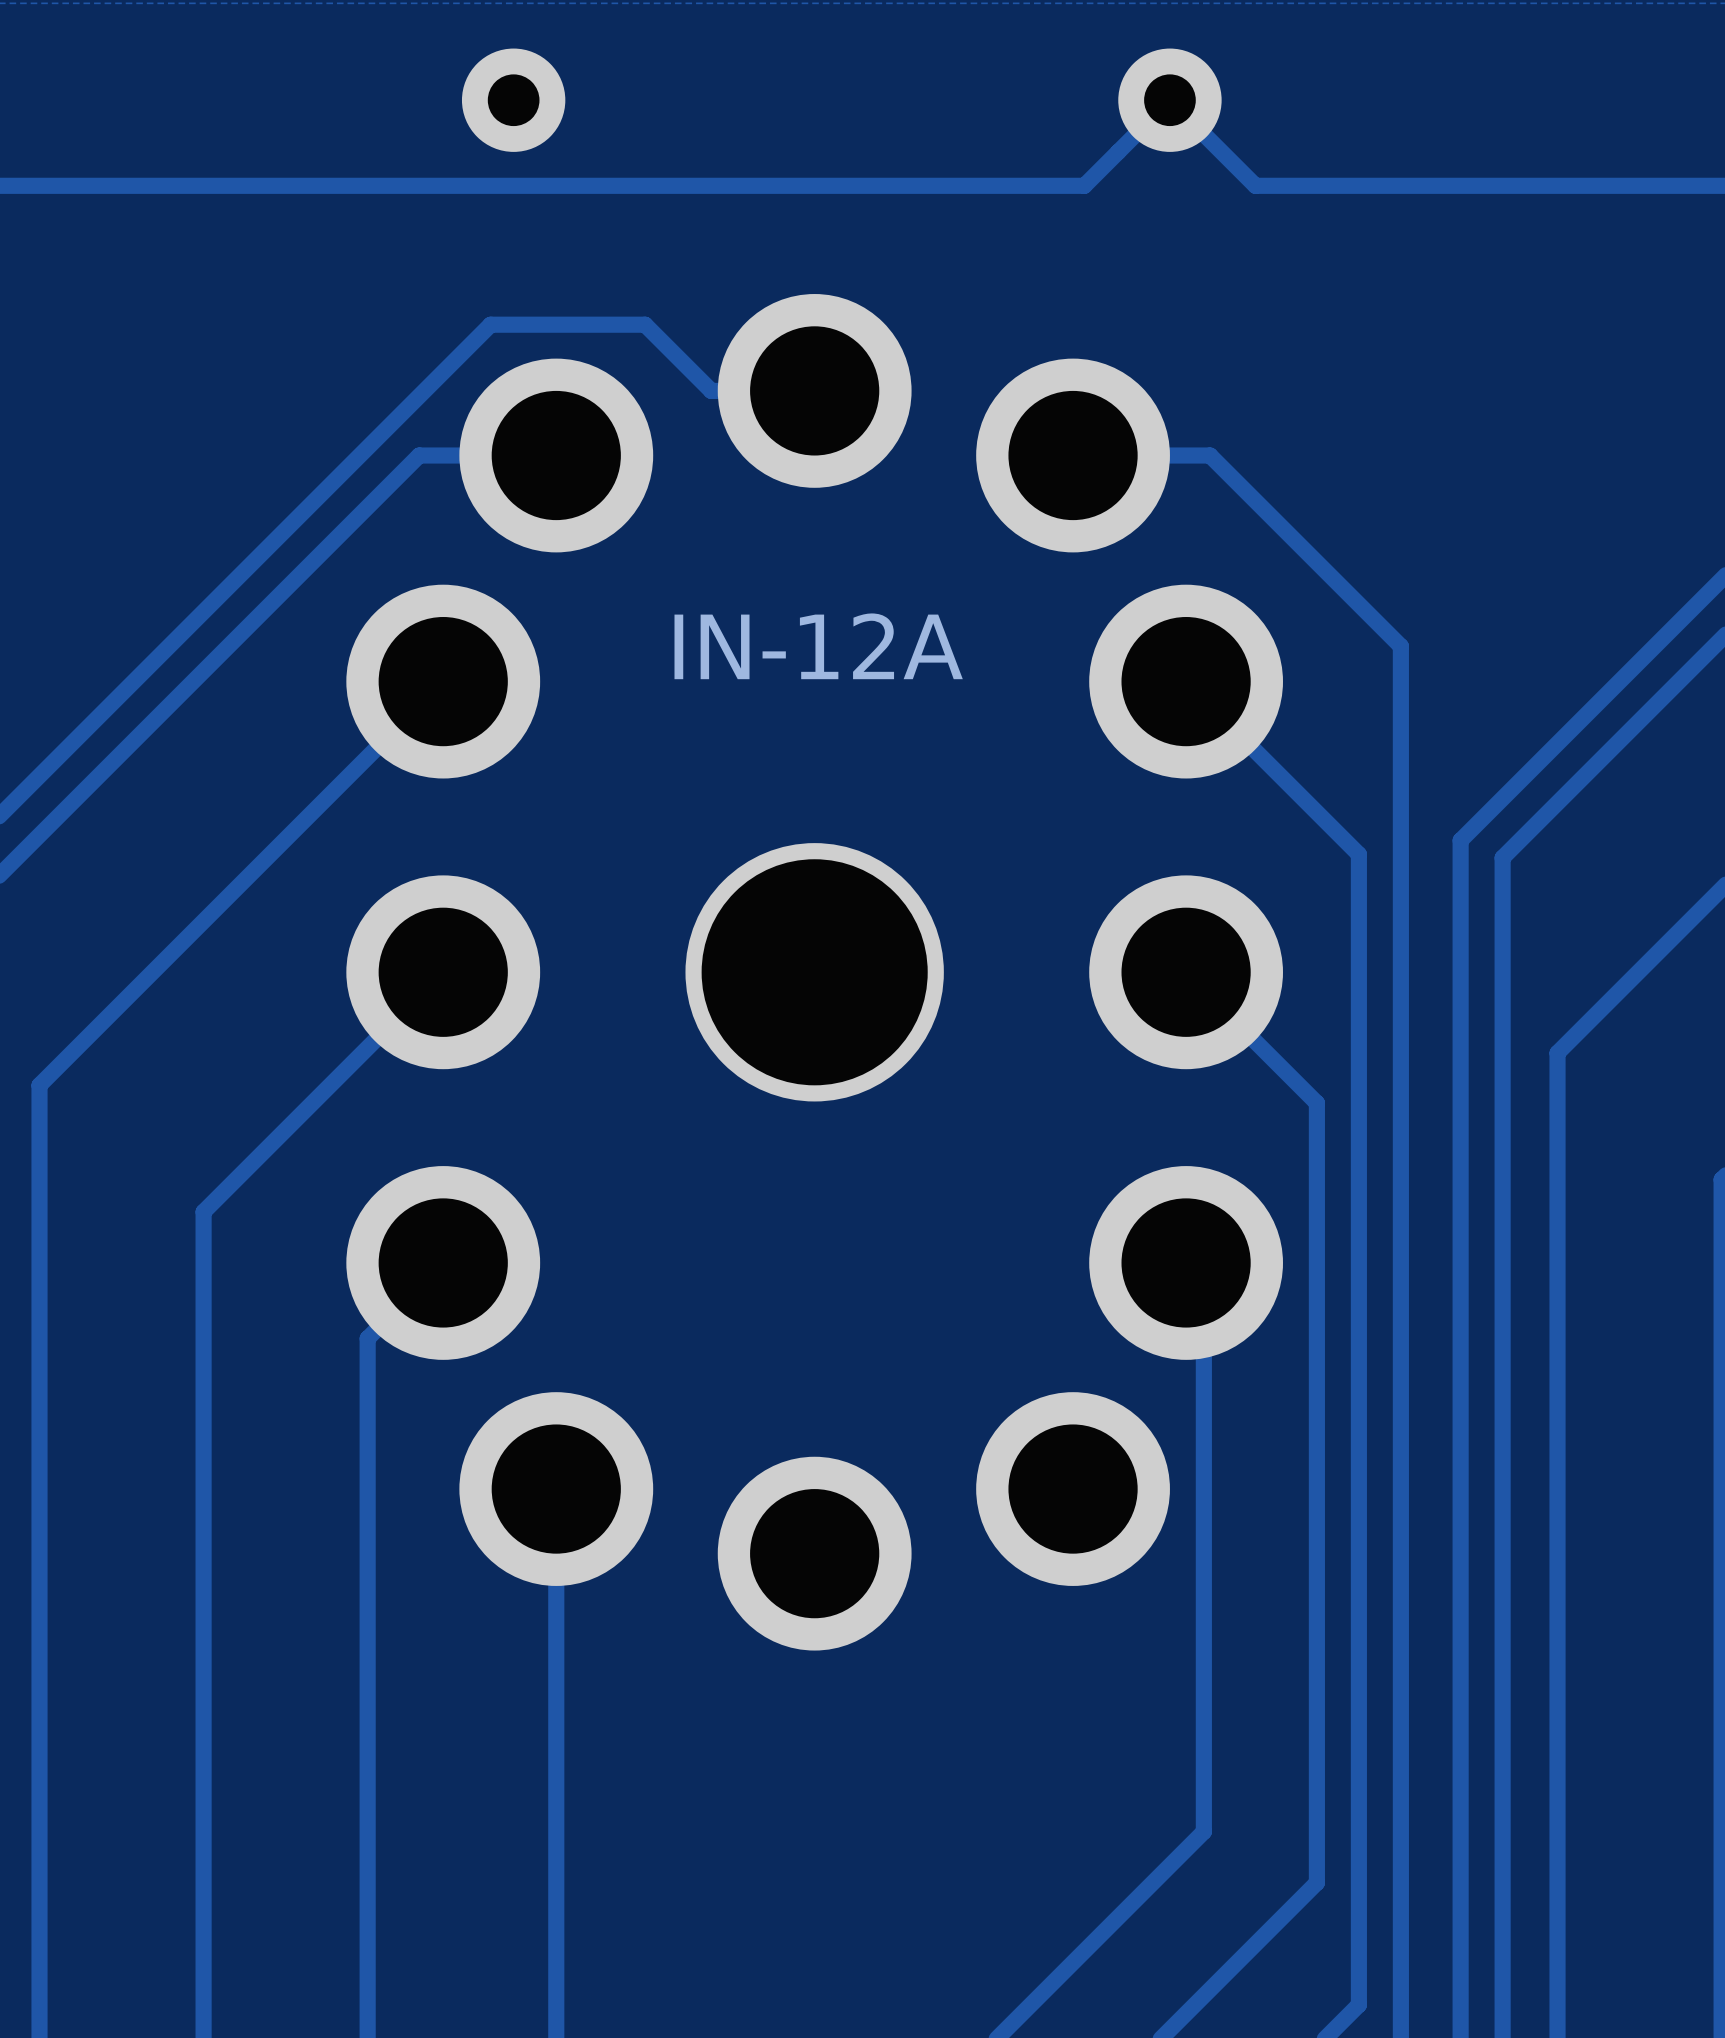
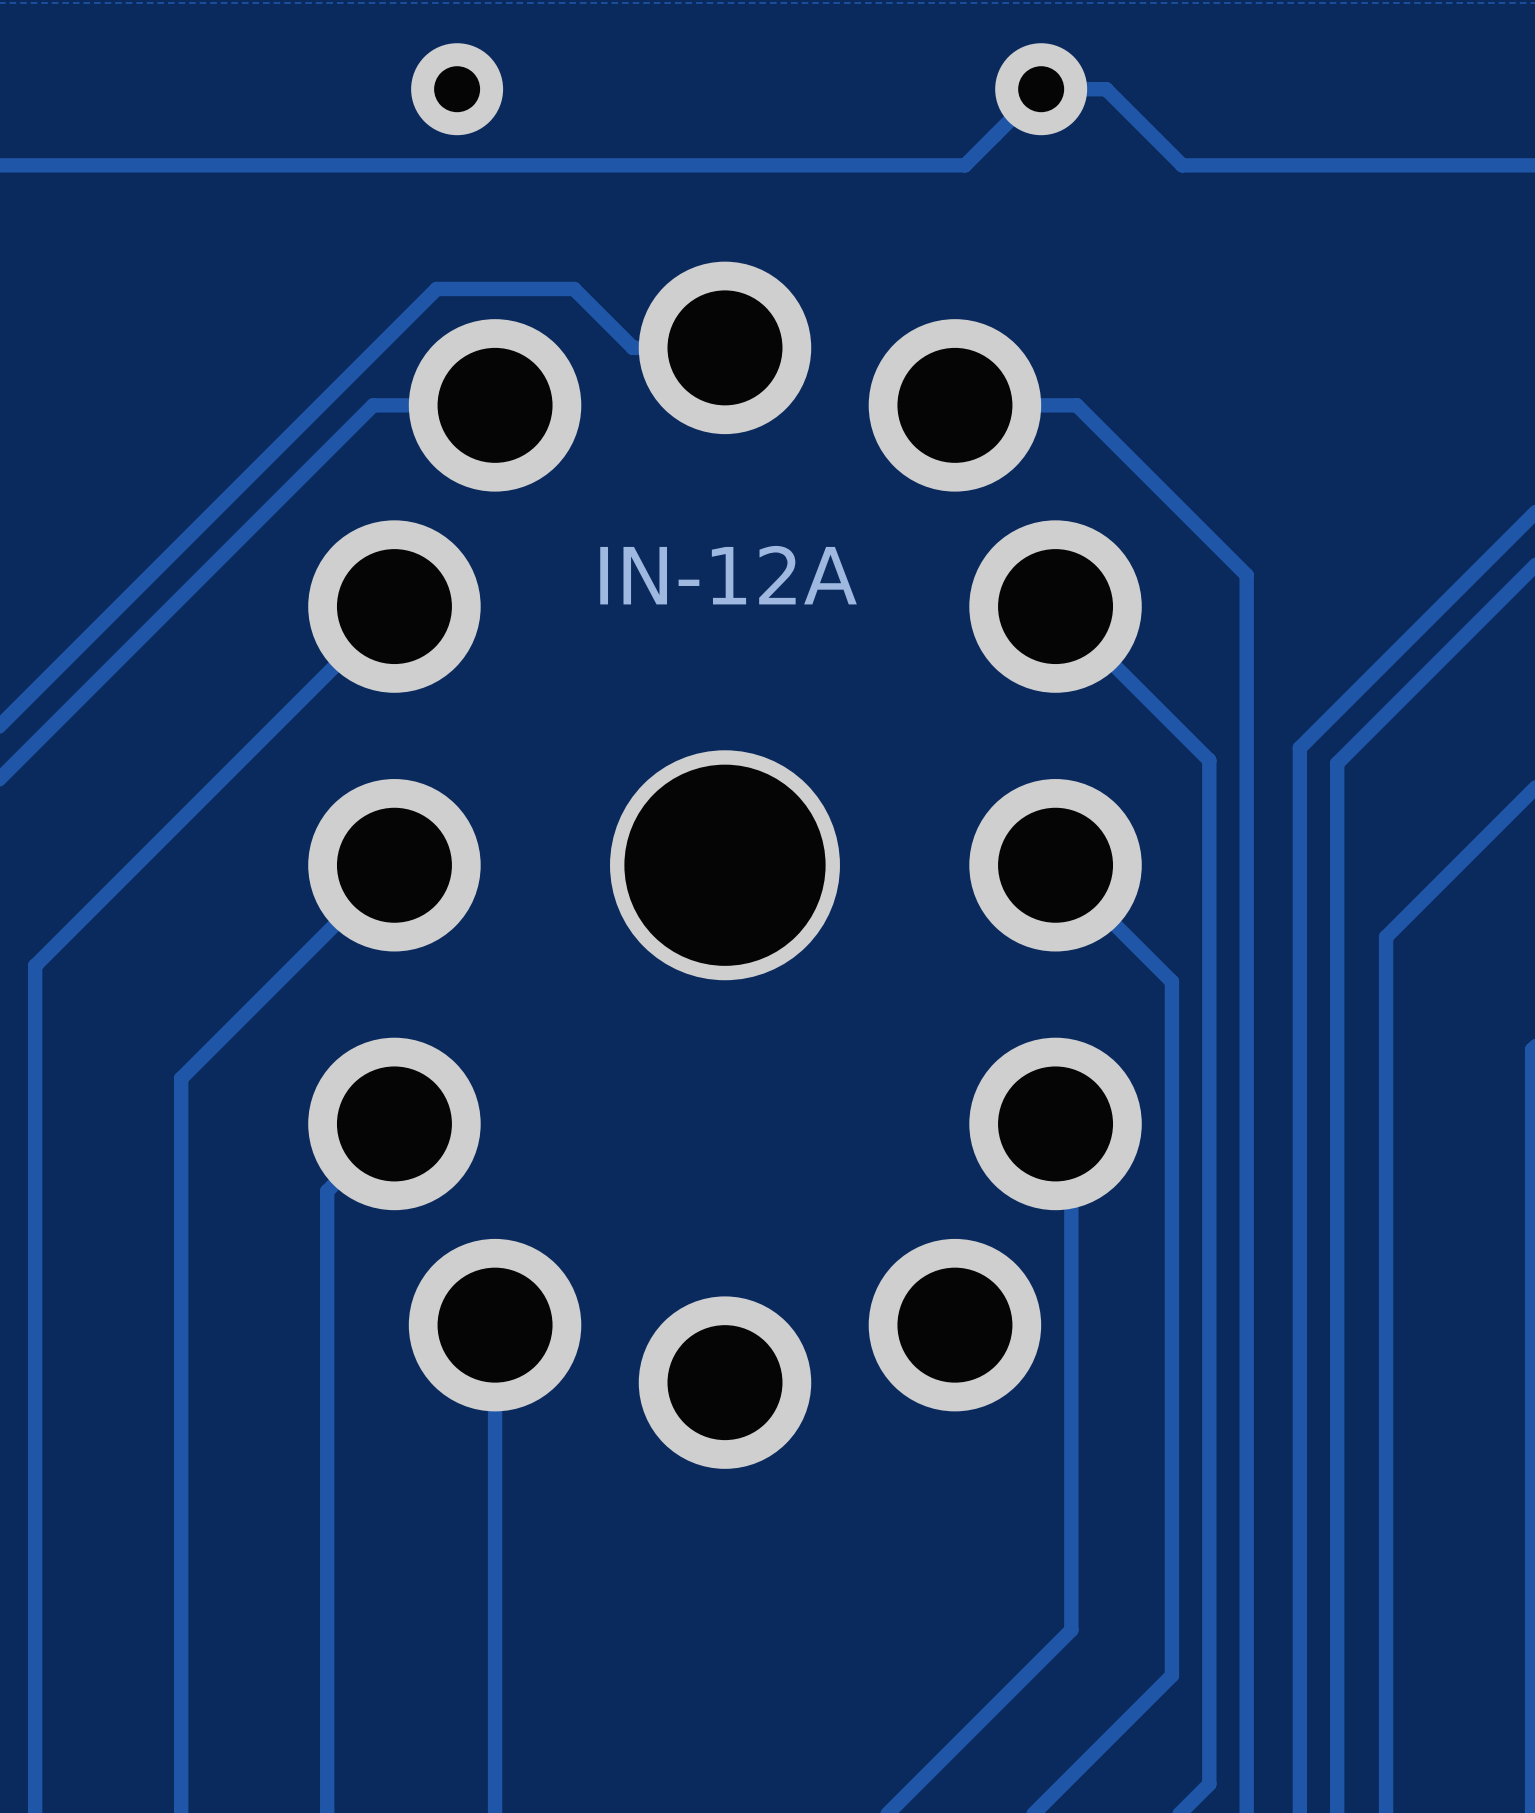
track: (1169, 100) (1255, 185) (1328, 185) -> (1041, 89) (1106, 89) (1182, 165)

